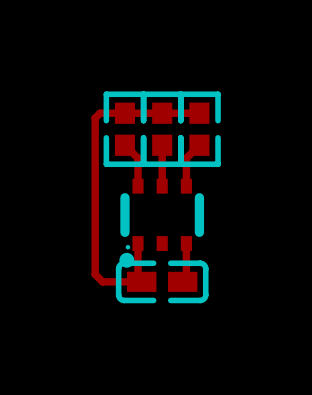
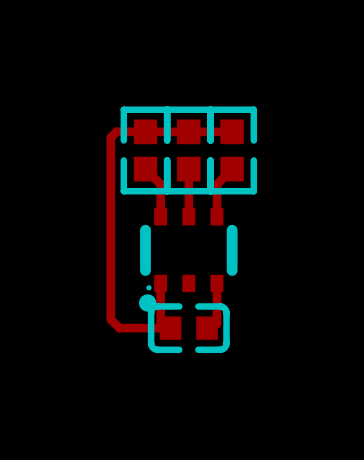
part footprint: [115, 260, 209, 304] -> [147, 303, 230, 354]

